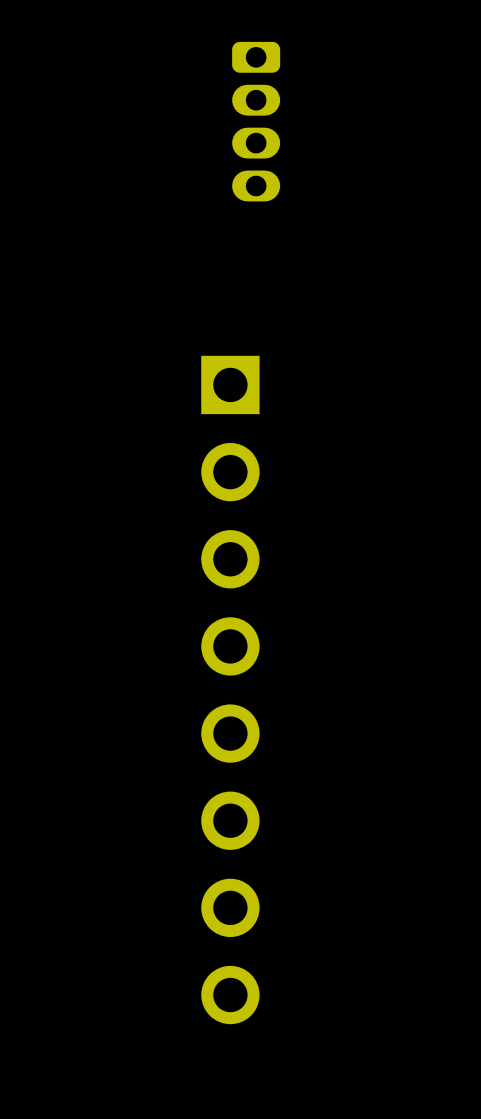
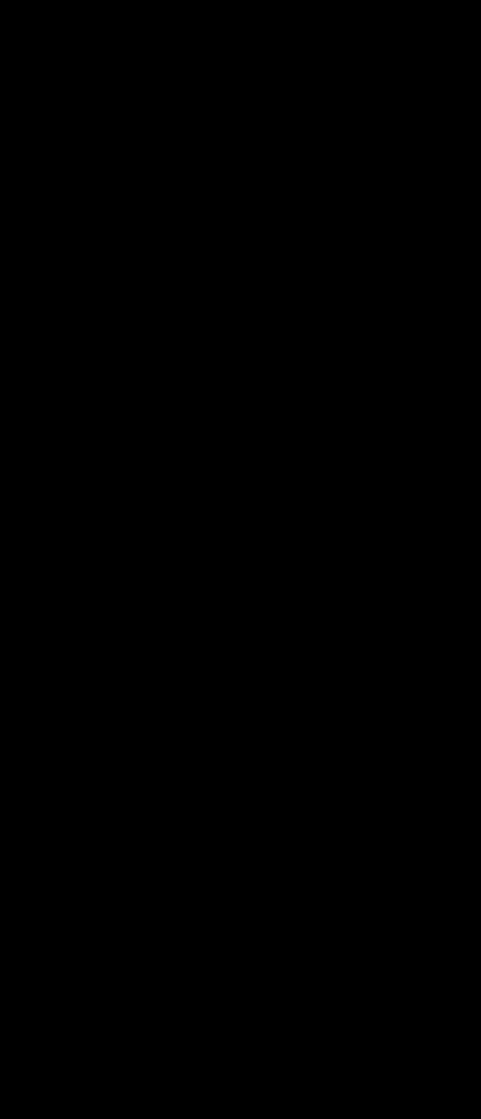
part: (256, 121) -> none
part: (230, 690) -> none

